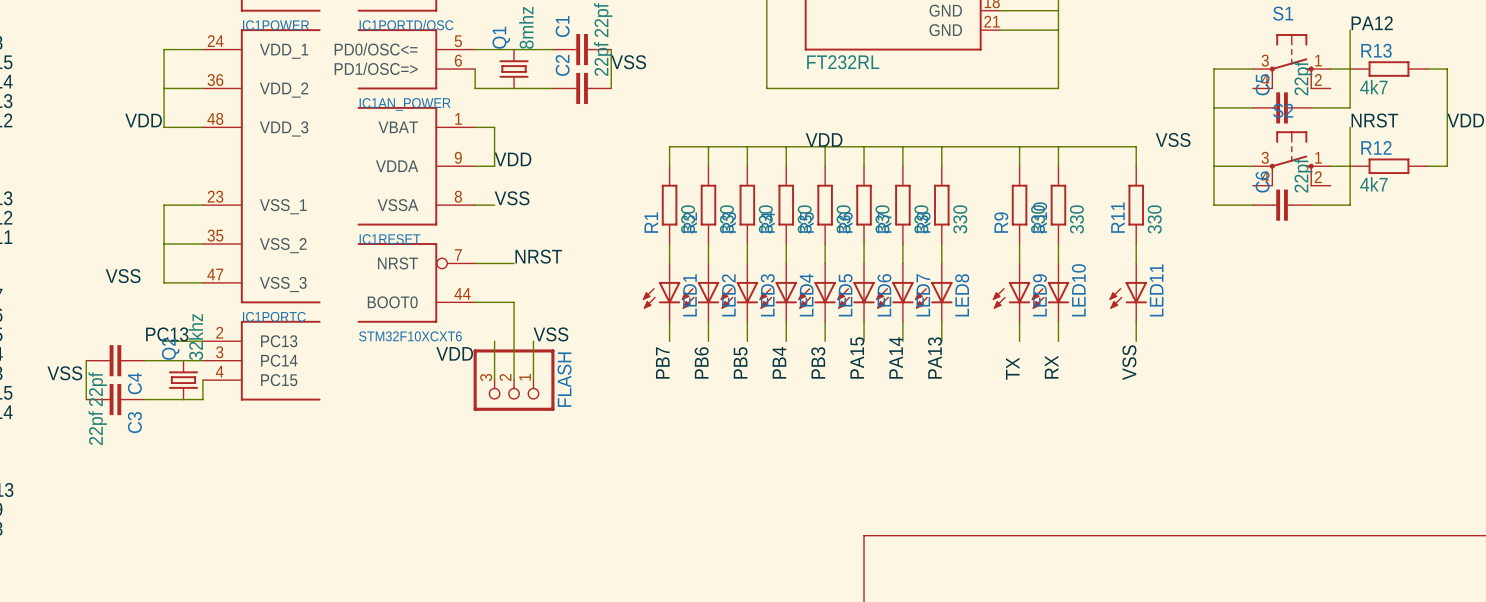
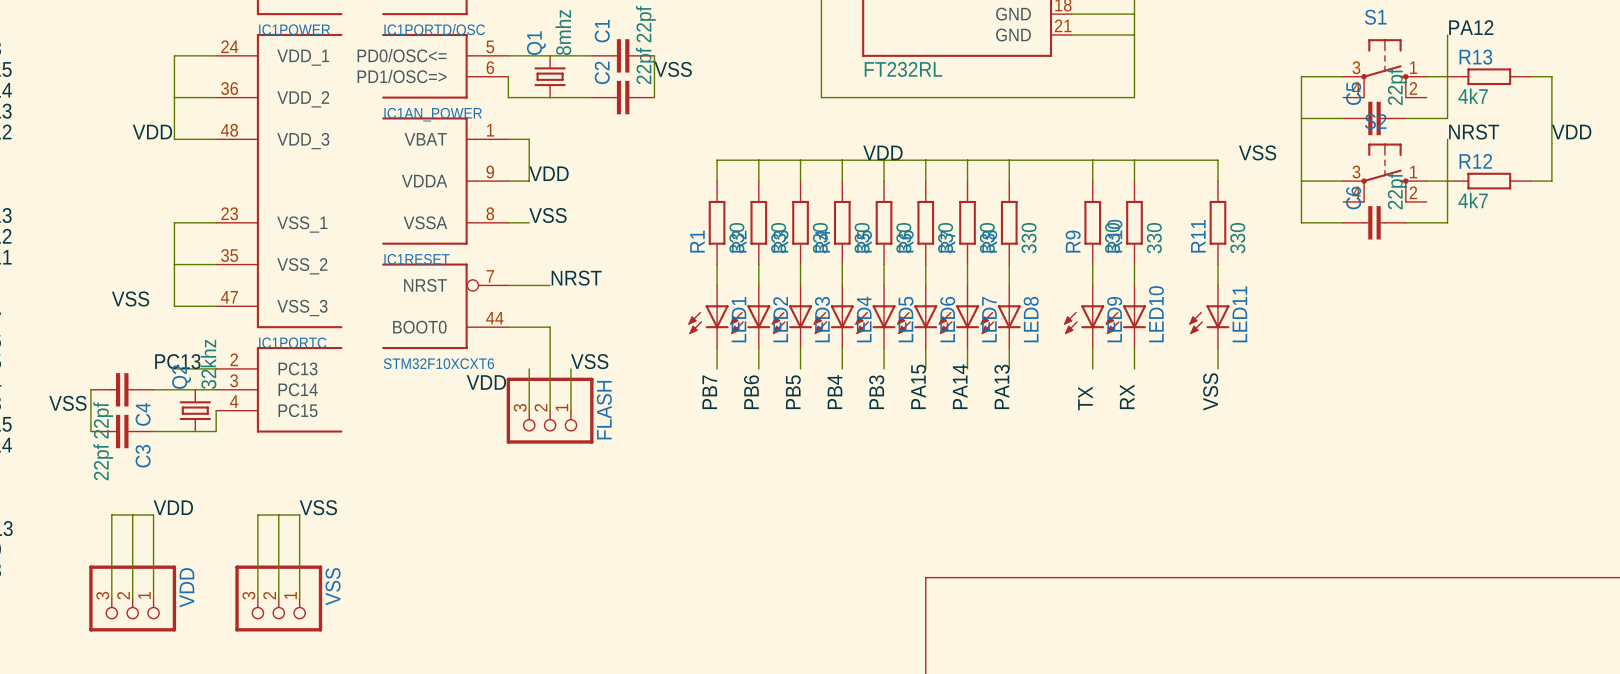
label: none -> VDD (173, 507)
label: none -> VSS (318, 507)
wire: none -> (132, 515) (132, 598)
wire: none -> (278, 515) (278, 598)
wire: none -> (111, 598) (111, 515) (153, 515) (153, 598)
VDD: none -> (132, 598)
wire: none -> (257, 598) (257, 515) (299, 515) (299, 598)
VSS: none -> (278, 598)

